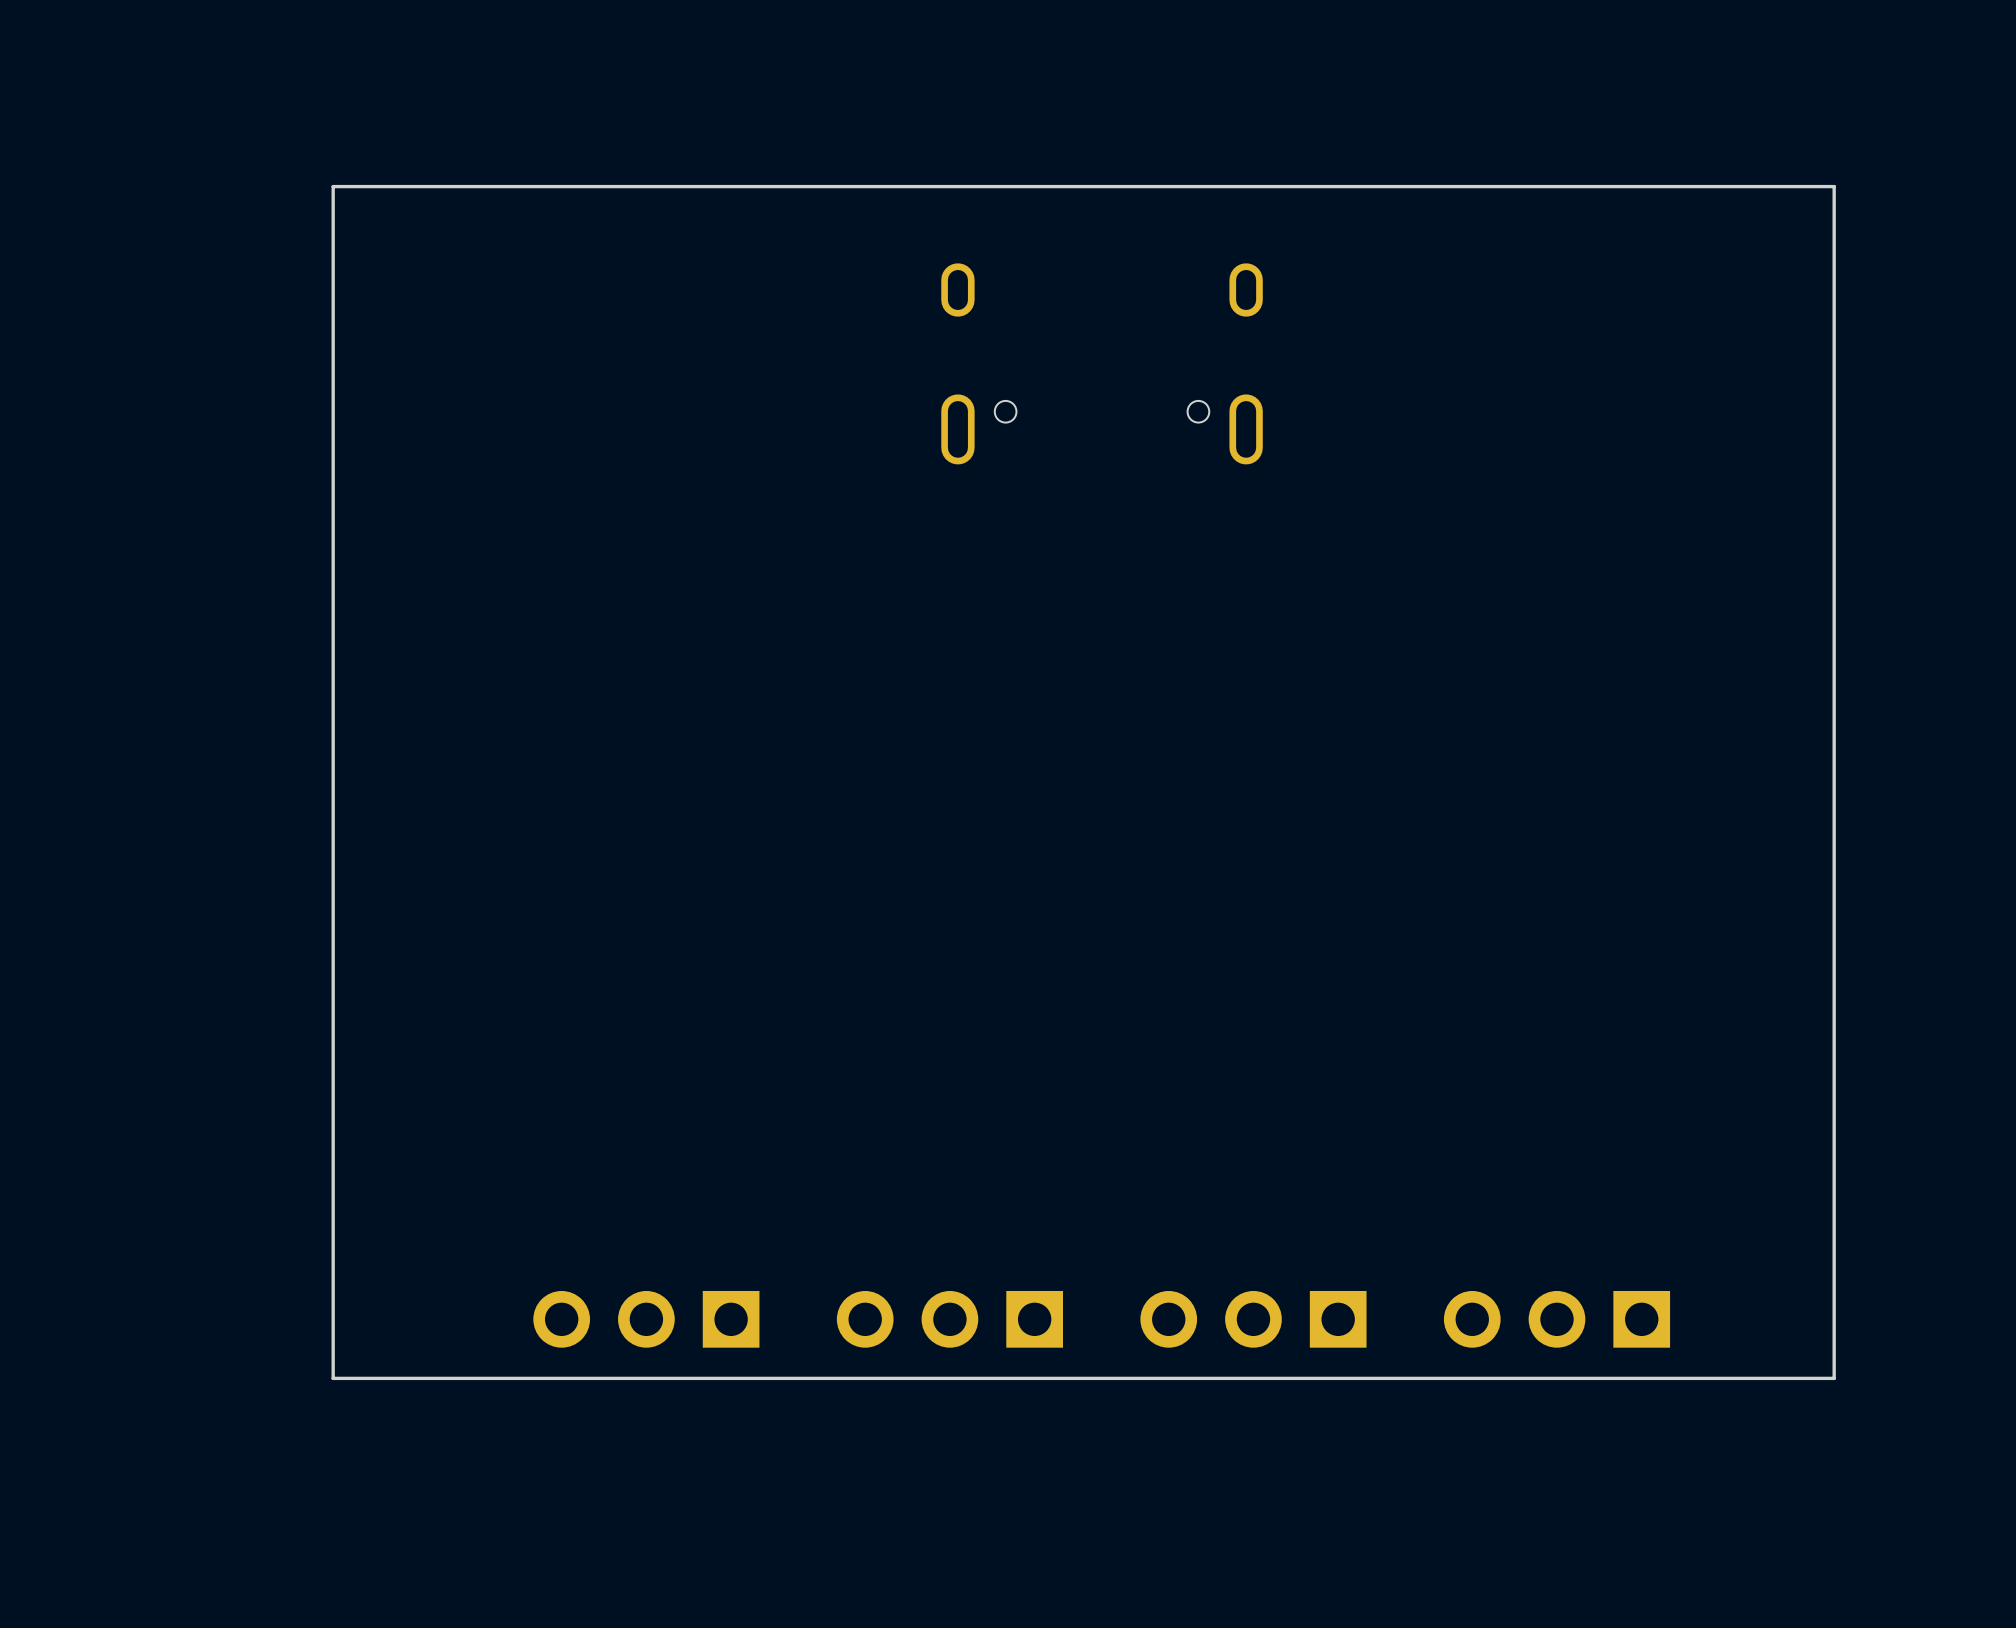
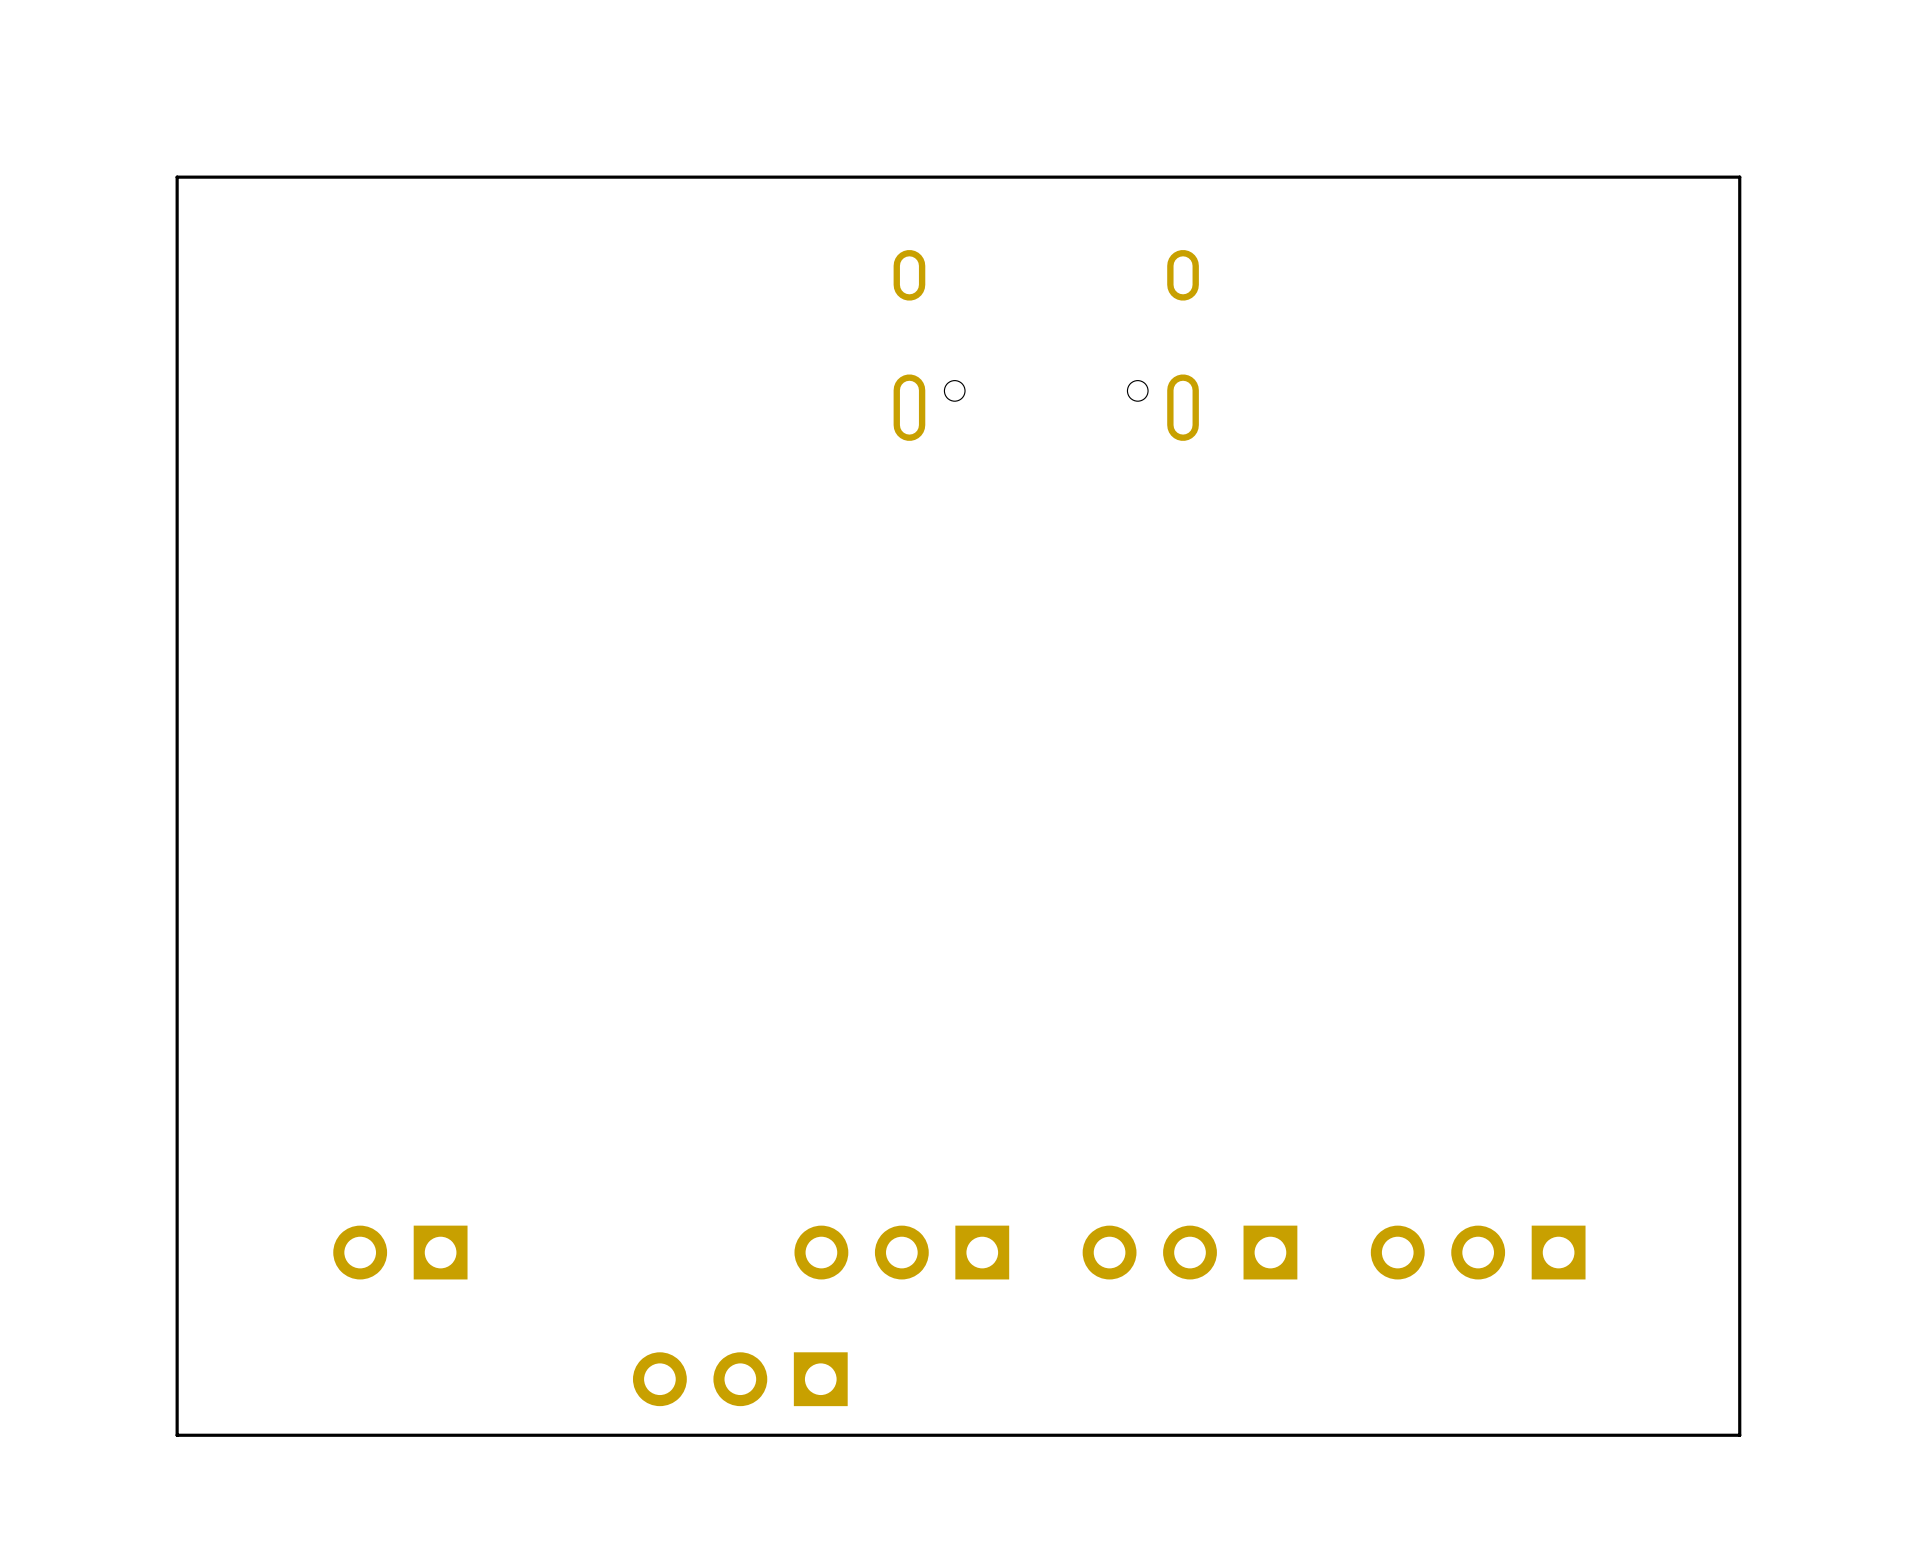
board edge: (1832, 186) (1834, 186) (1834, 1378) (333, 1378) (333, 186) -> (1739, 177) (1739, 1435) (177, 1435) (177, 177) (316, 177)
part: none -> (400, 1252)
part position: (646, 1319) -> (740, 1379)

